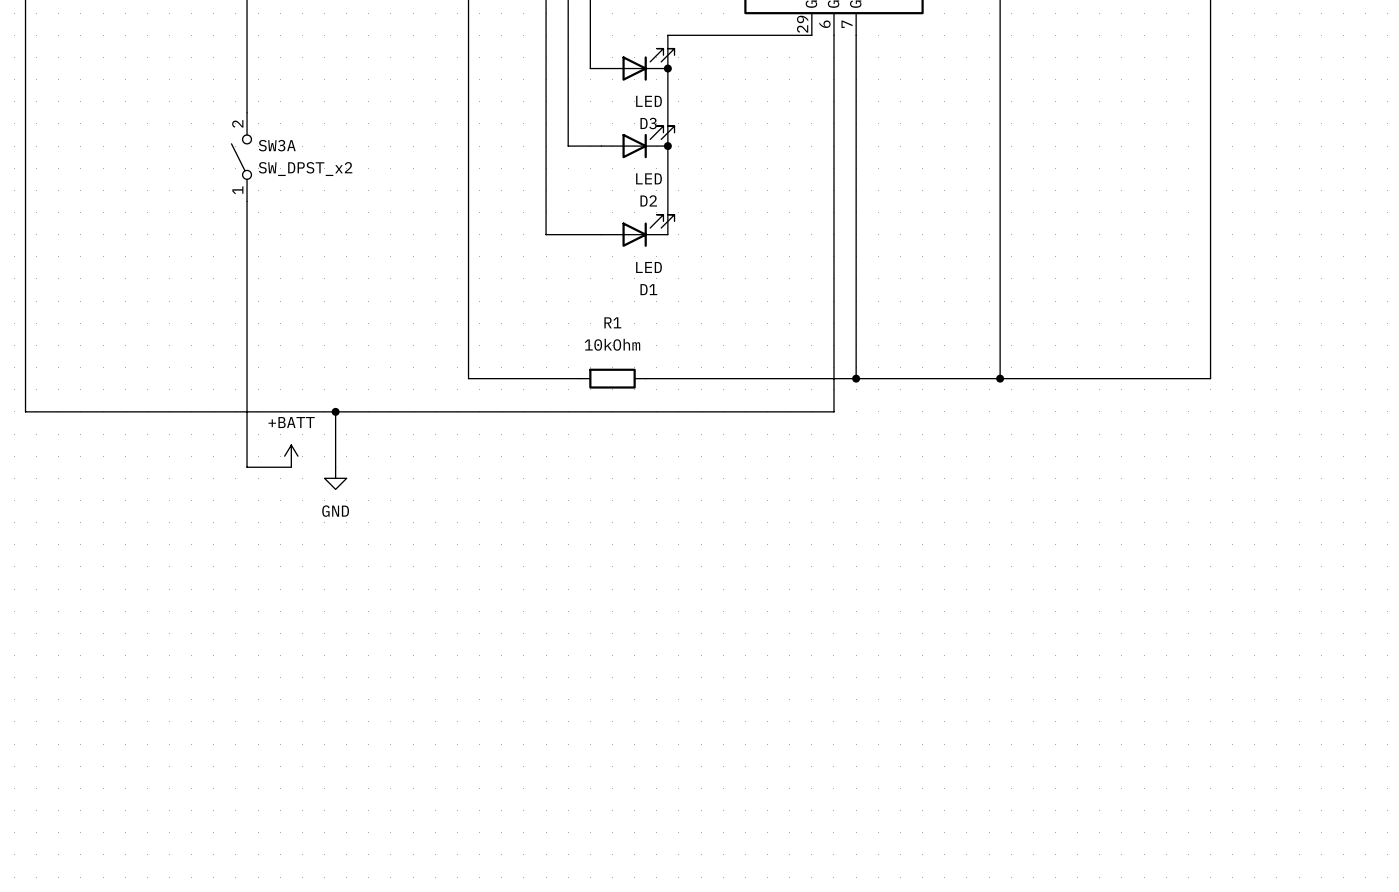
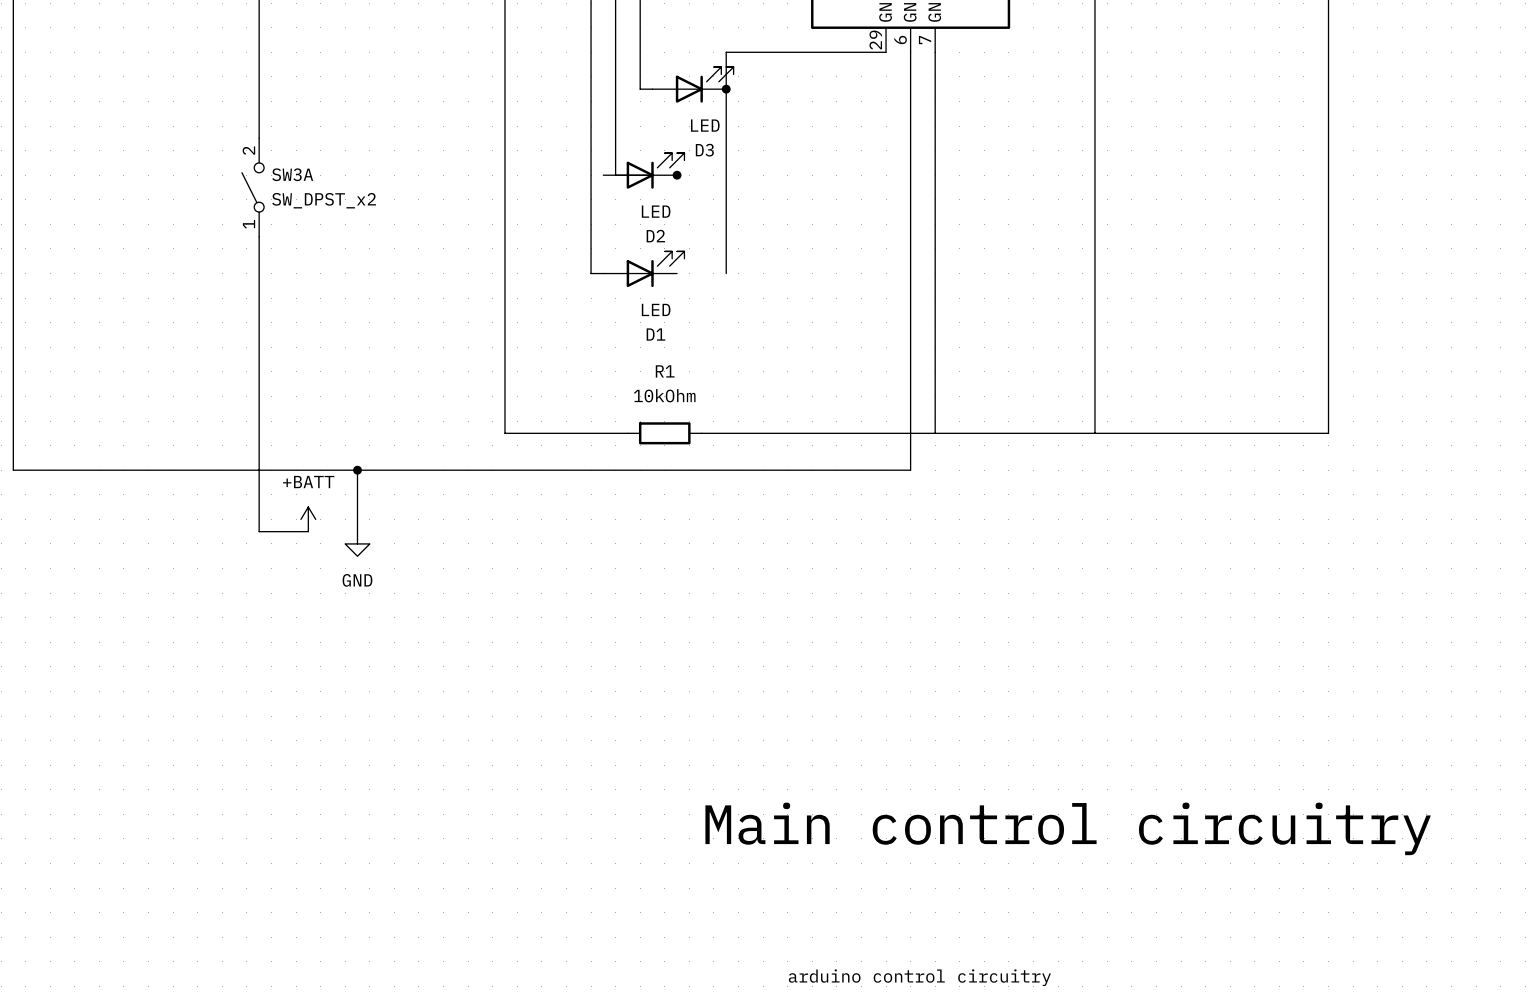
D2 position: (637, 142) -> (643, 170)
junction position: (667, 146) -> (677, 175)
D1 position: (637, 230) -> (643, 269)
junction: (856, 378) -> none
junction: (1000, 378) -> none
text: none -> Main control circuitry (1068, 828)
text: none -> arduino control circuitry (919, 977)

